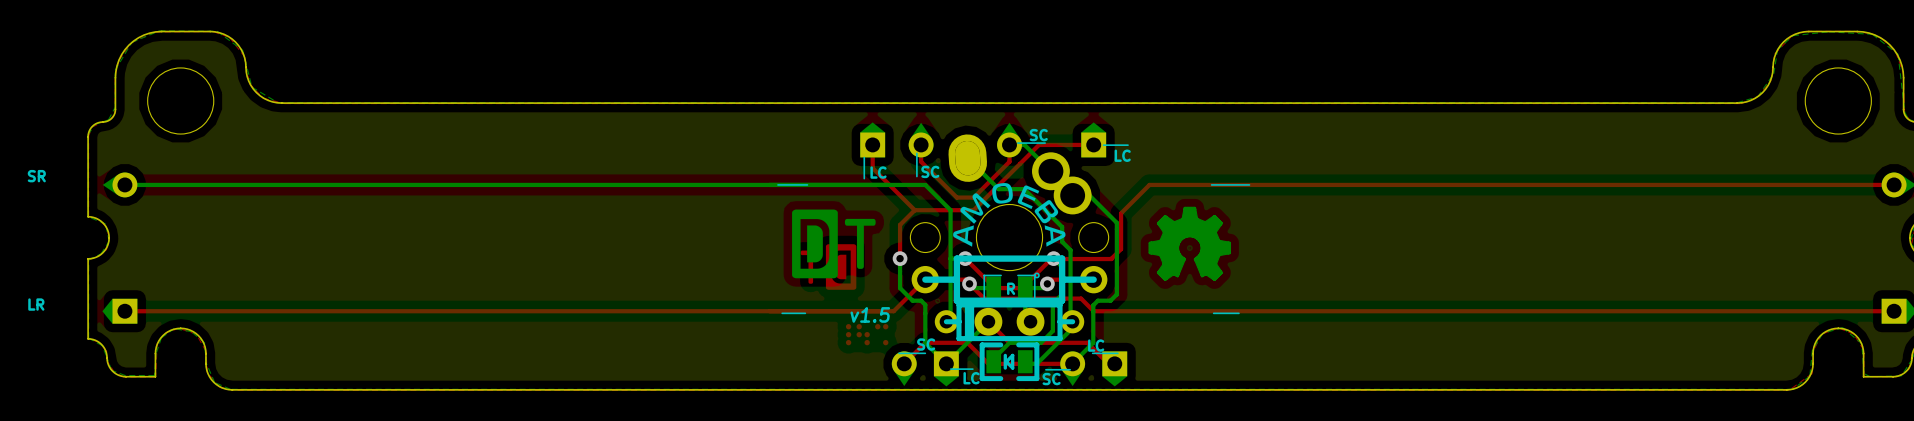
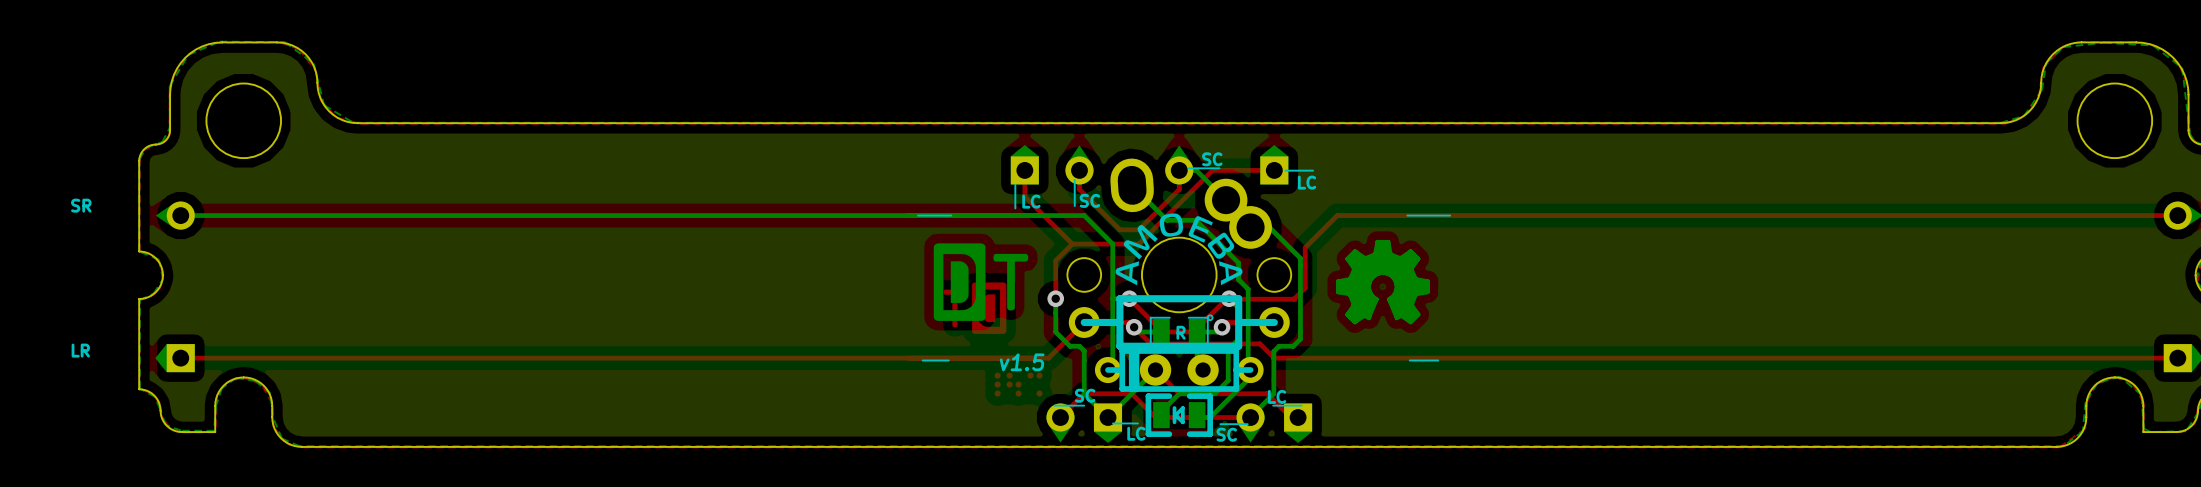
board edge: (967, 153) (968, 162) (967, 153) -> none

